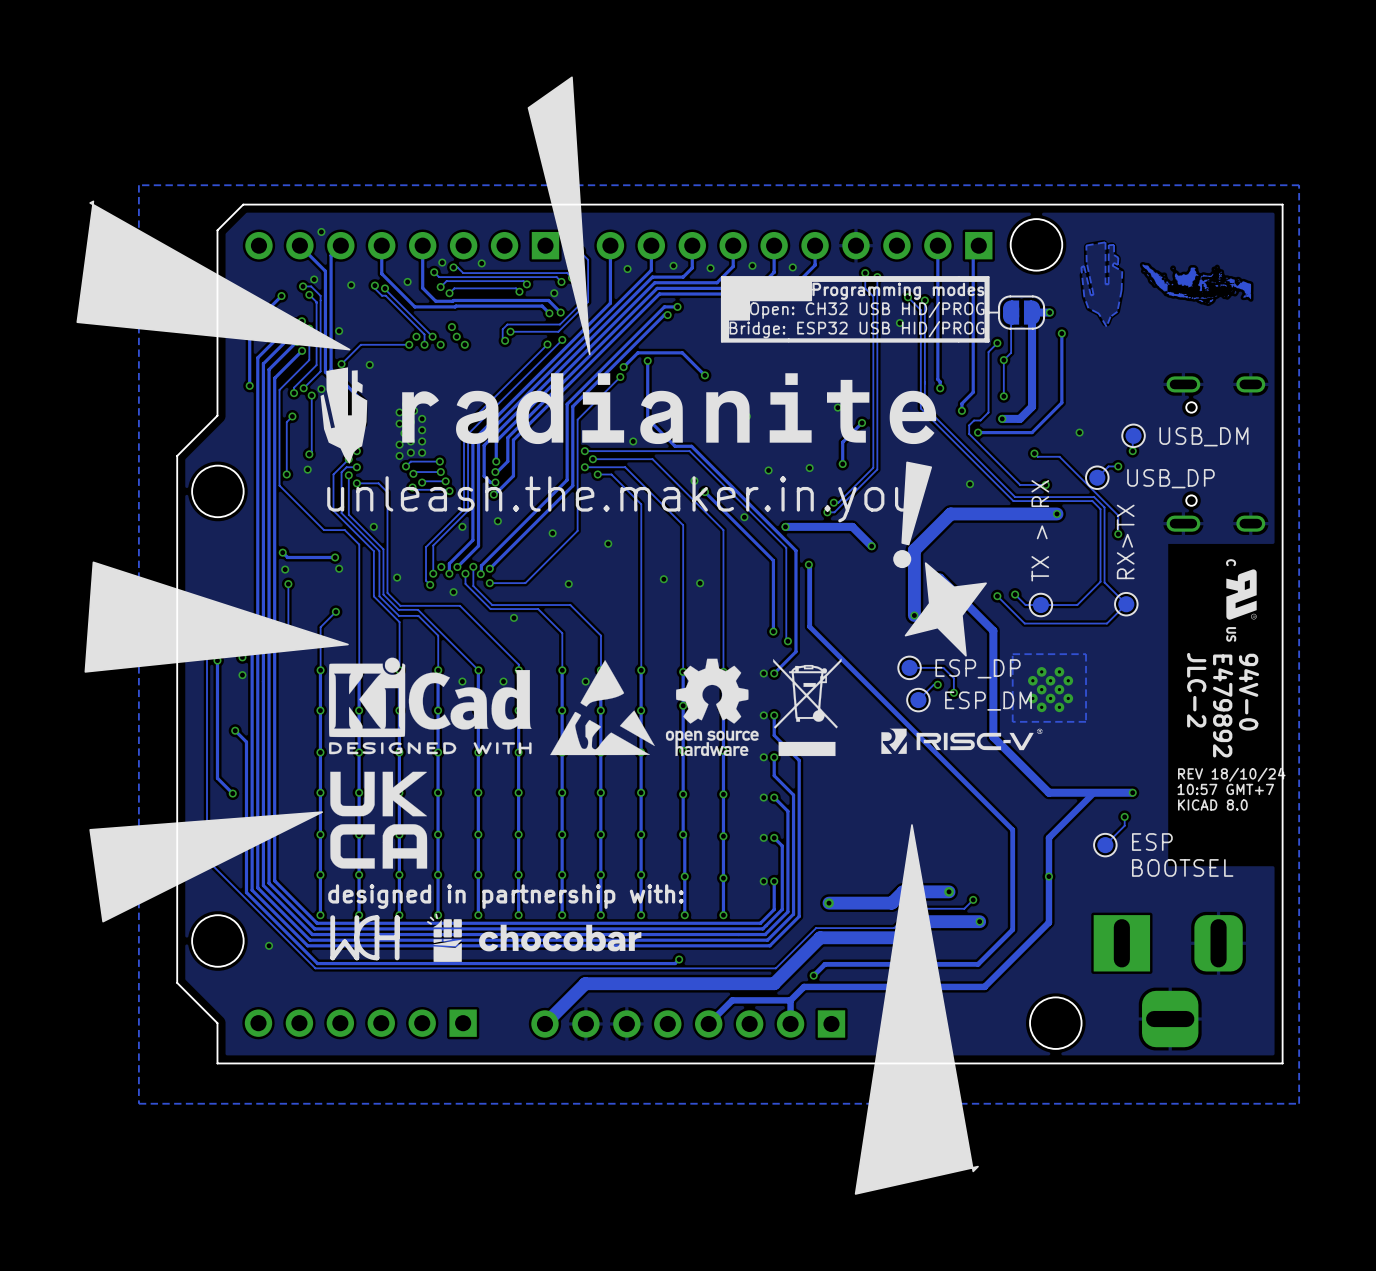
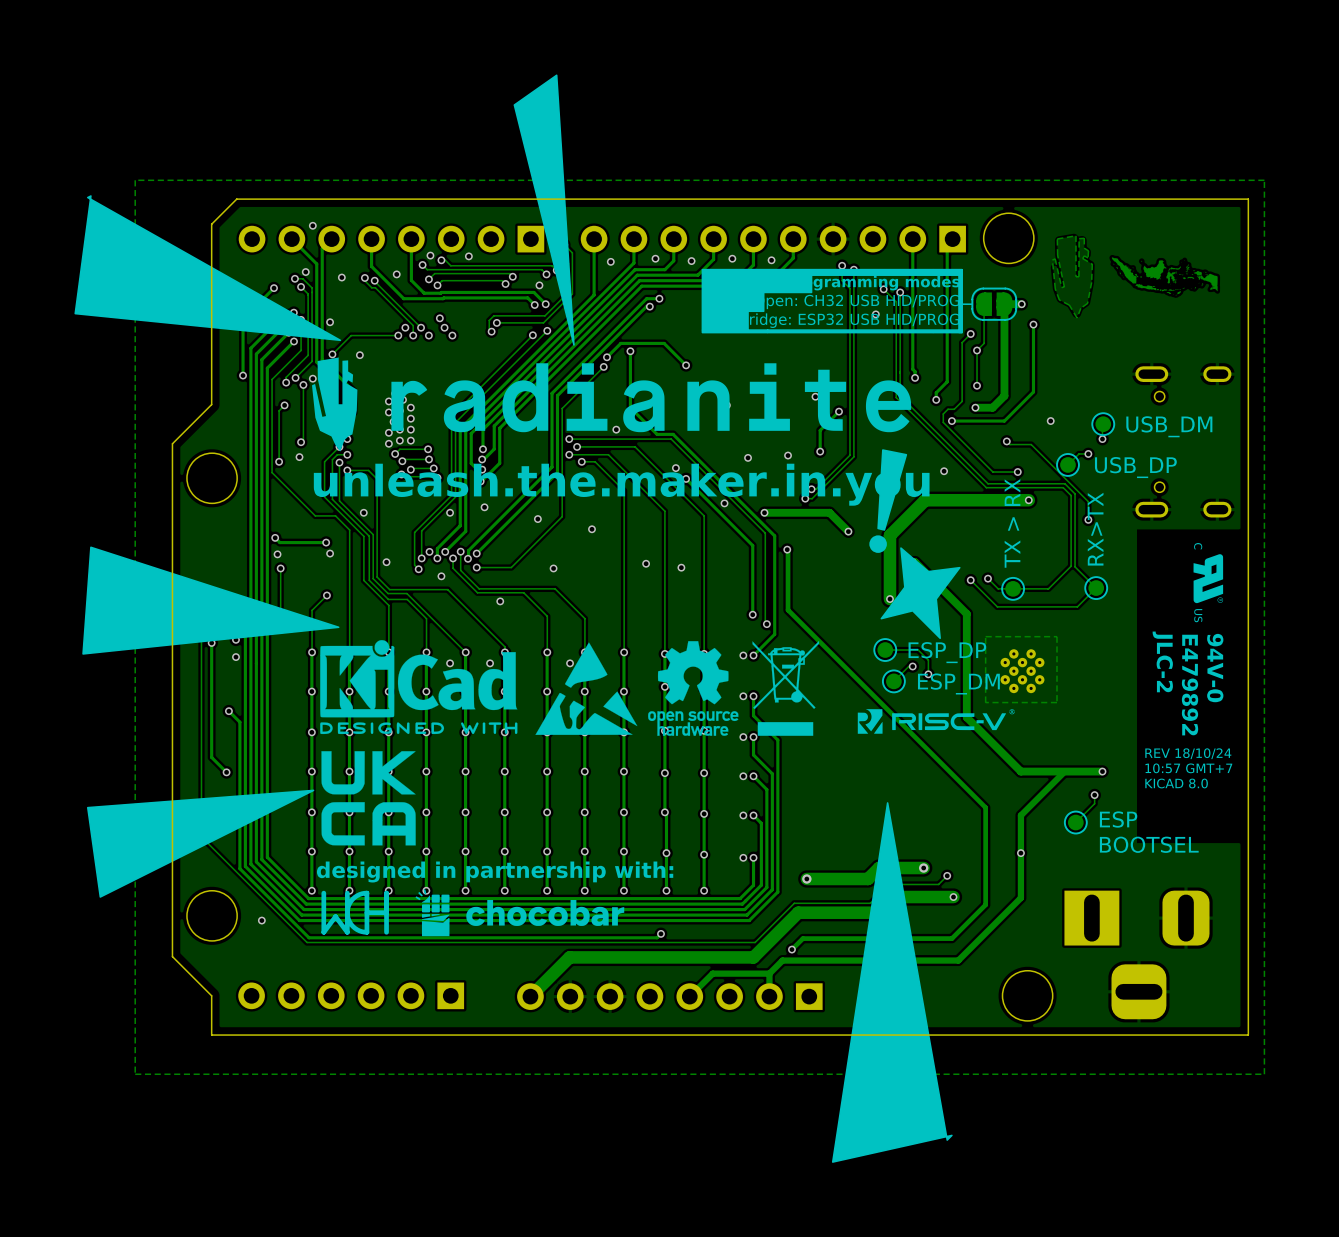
drawing shape: [721, 276, 990, 340] -> [701, 268, 963, 331]

